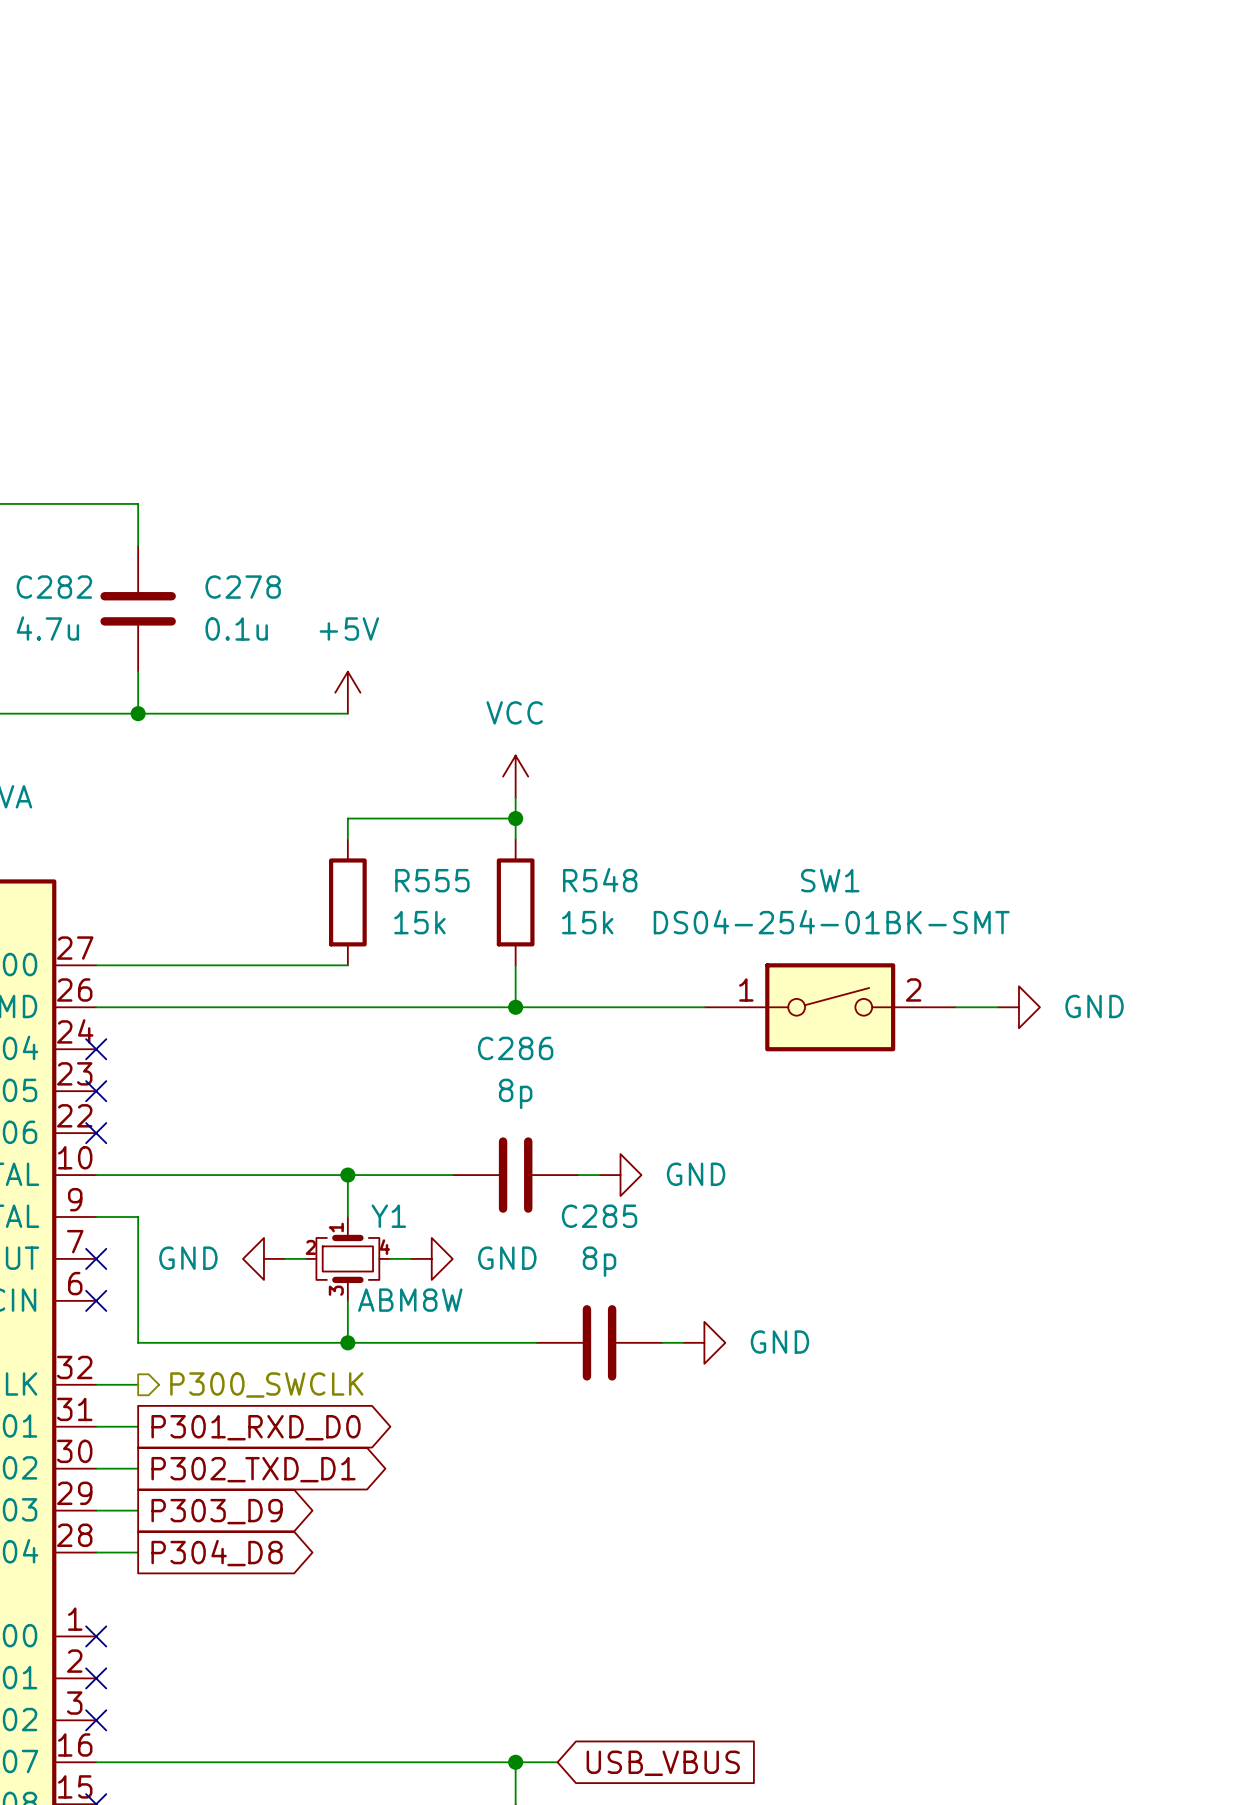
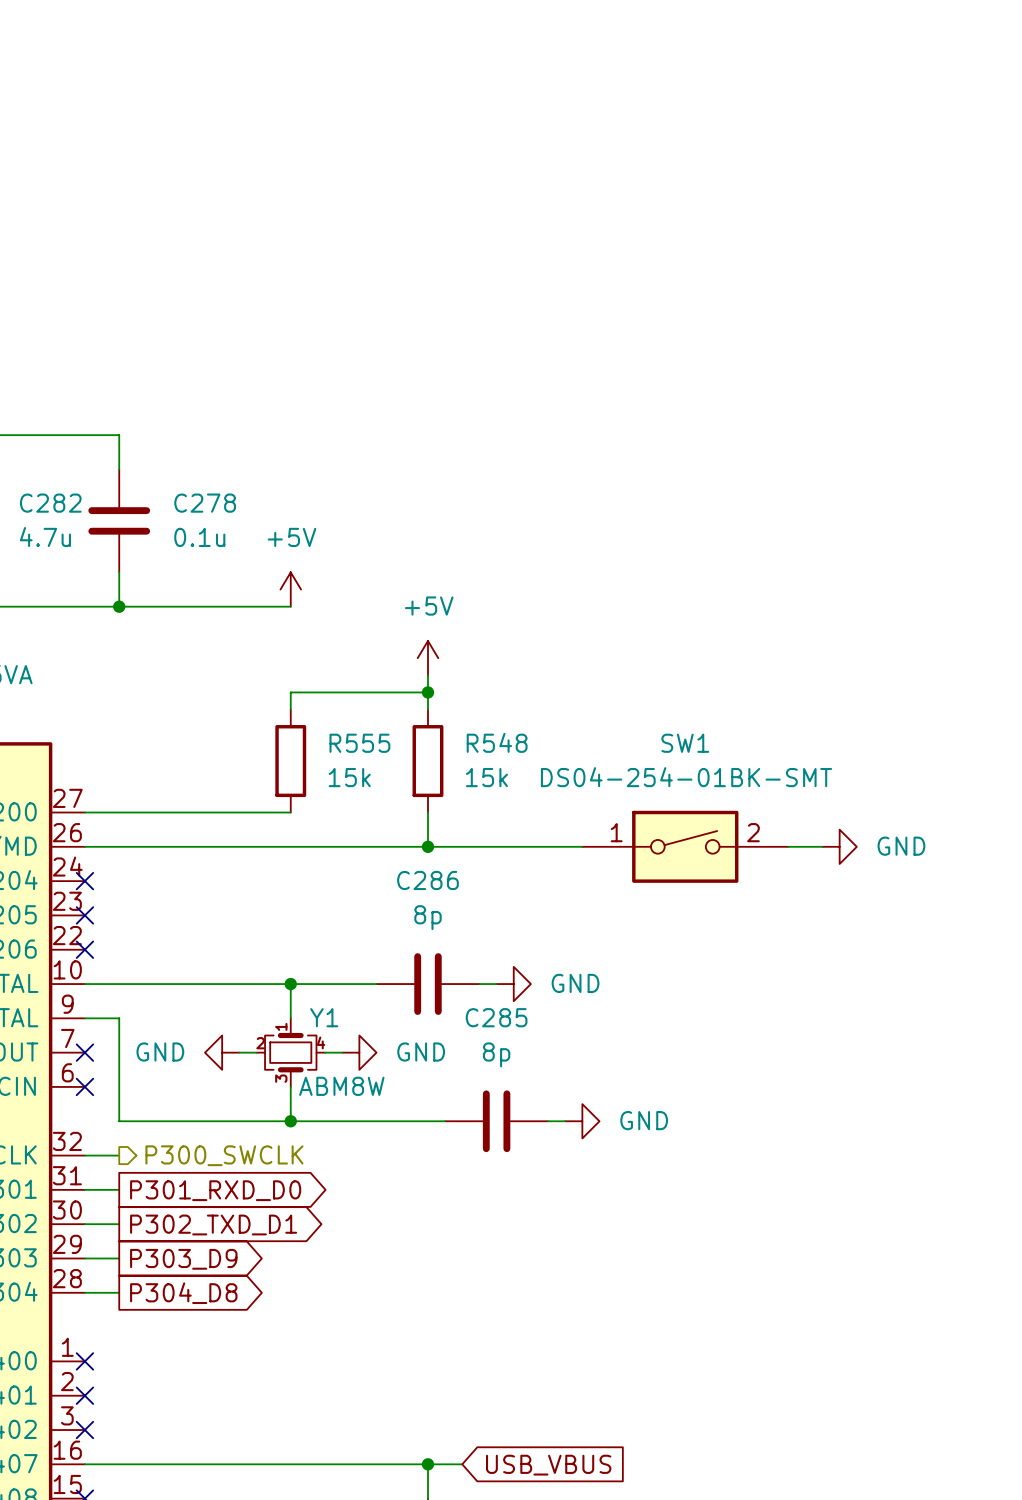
power symbol: VCC (515, 776) -> +5V (427, 658)

